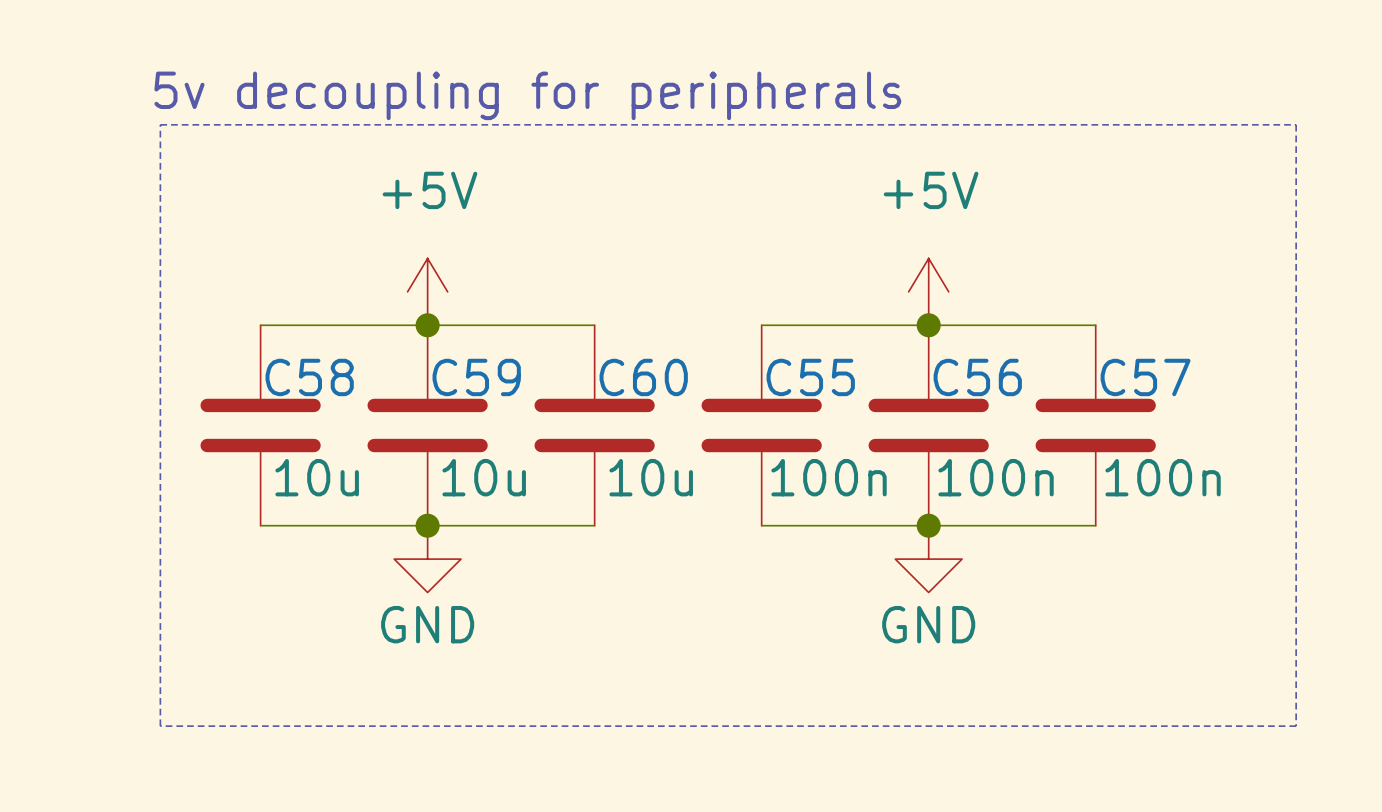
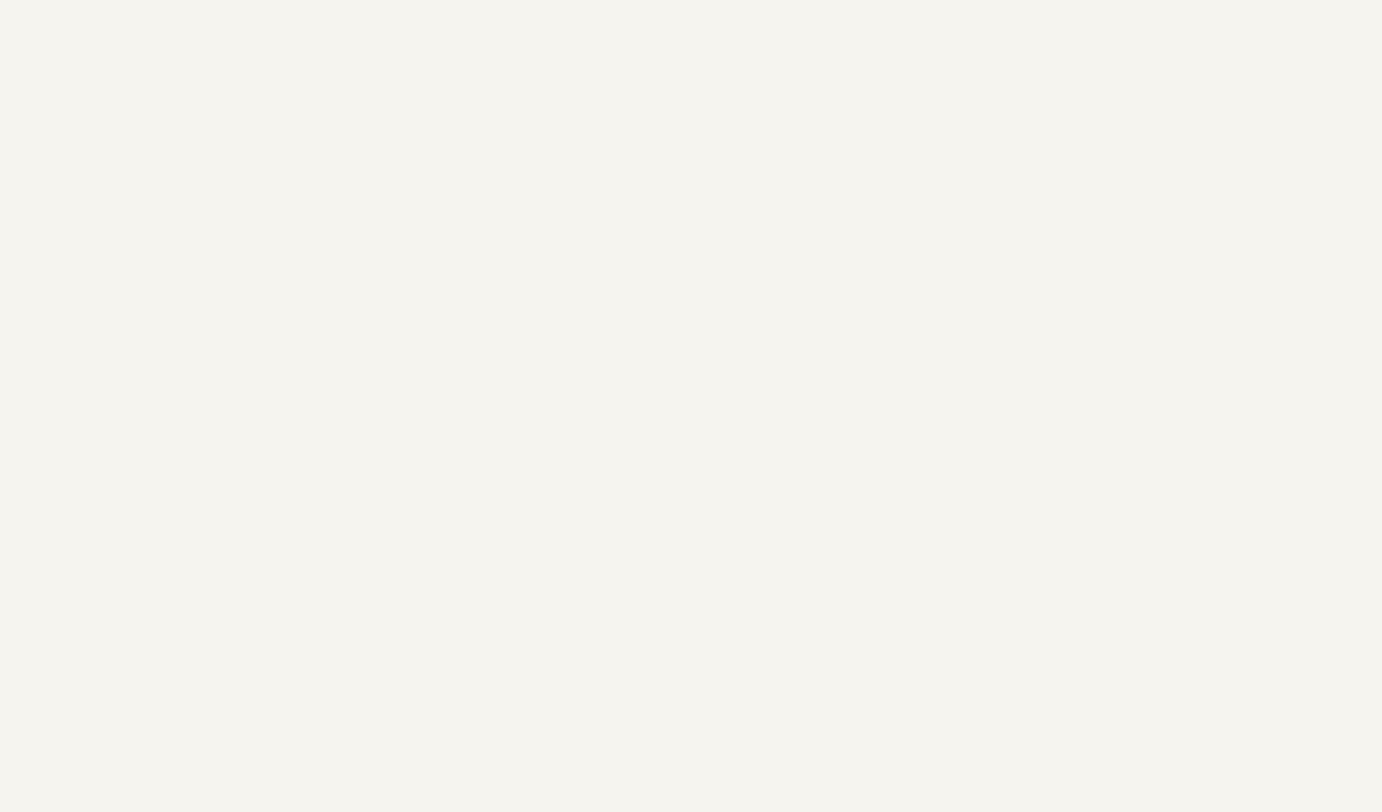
text: 5v decoupling for peripherals (527, 95) -> none
line: (160, 124) (160, 726) (1296, 726) (1296, 124) (160, 124) -> none
power symbol: +5V (427, 291) -> none
power symbol: +5V (928, 291) -> none
wire: (260, 325) (594, 325) -> none
junction: (427, 325) -> none
wire: (761, 325) (1095, 325) -> none
junction: (928, 325) -> none
C58: 10u (260, 425) -> none
C59: 10u (427, 425) -> none
C60: 10u (594, 425) -> none
C55: 100n (761, 425) -> none
C56: 100n (928, 425) -> none
C57: 100n (1095, 425) -> none
wire: (260, 525) (594, 525) -> none
junction: (427, 525) -> none
wire: (761, 525) (1095, 525) -> none
junction: (928, 525) -> none
power symbol: GND (427, 559) -> none
power symbol: GND (928, 559) -> none

